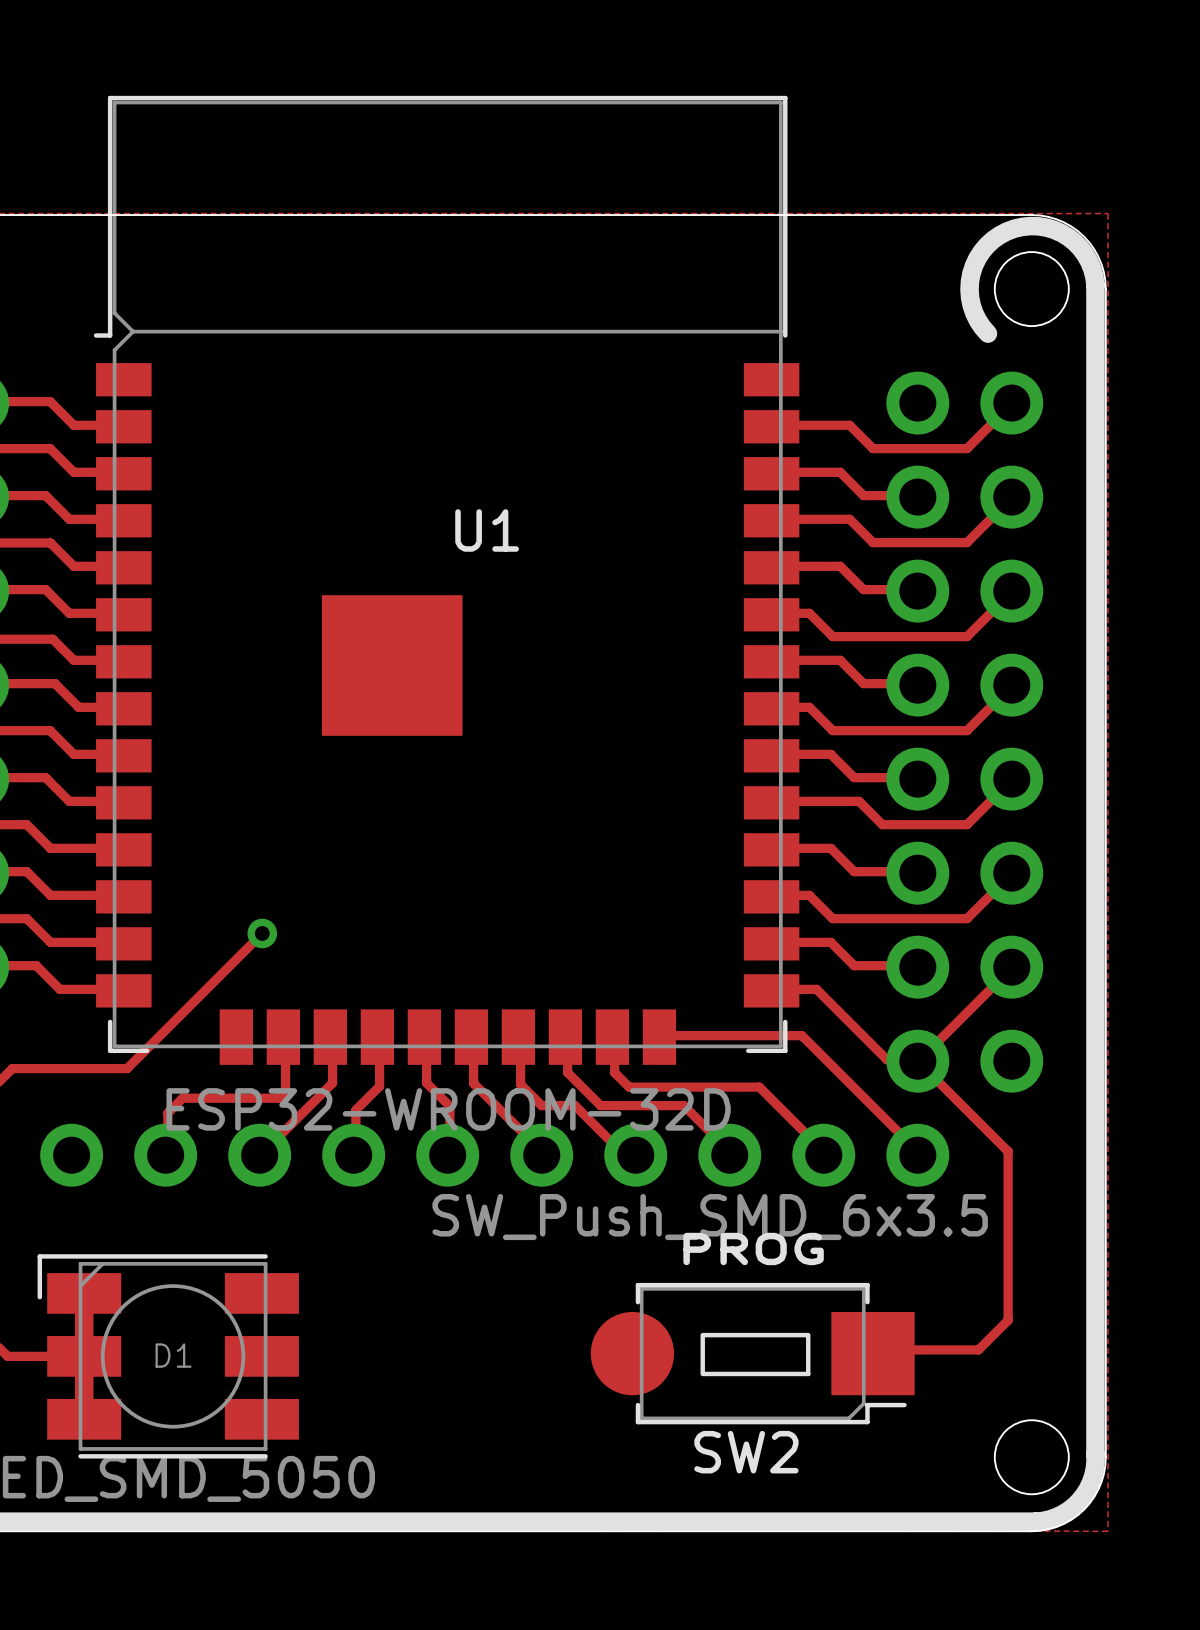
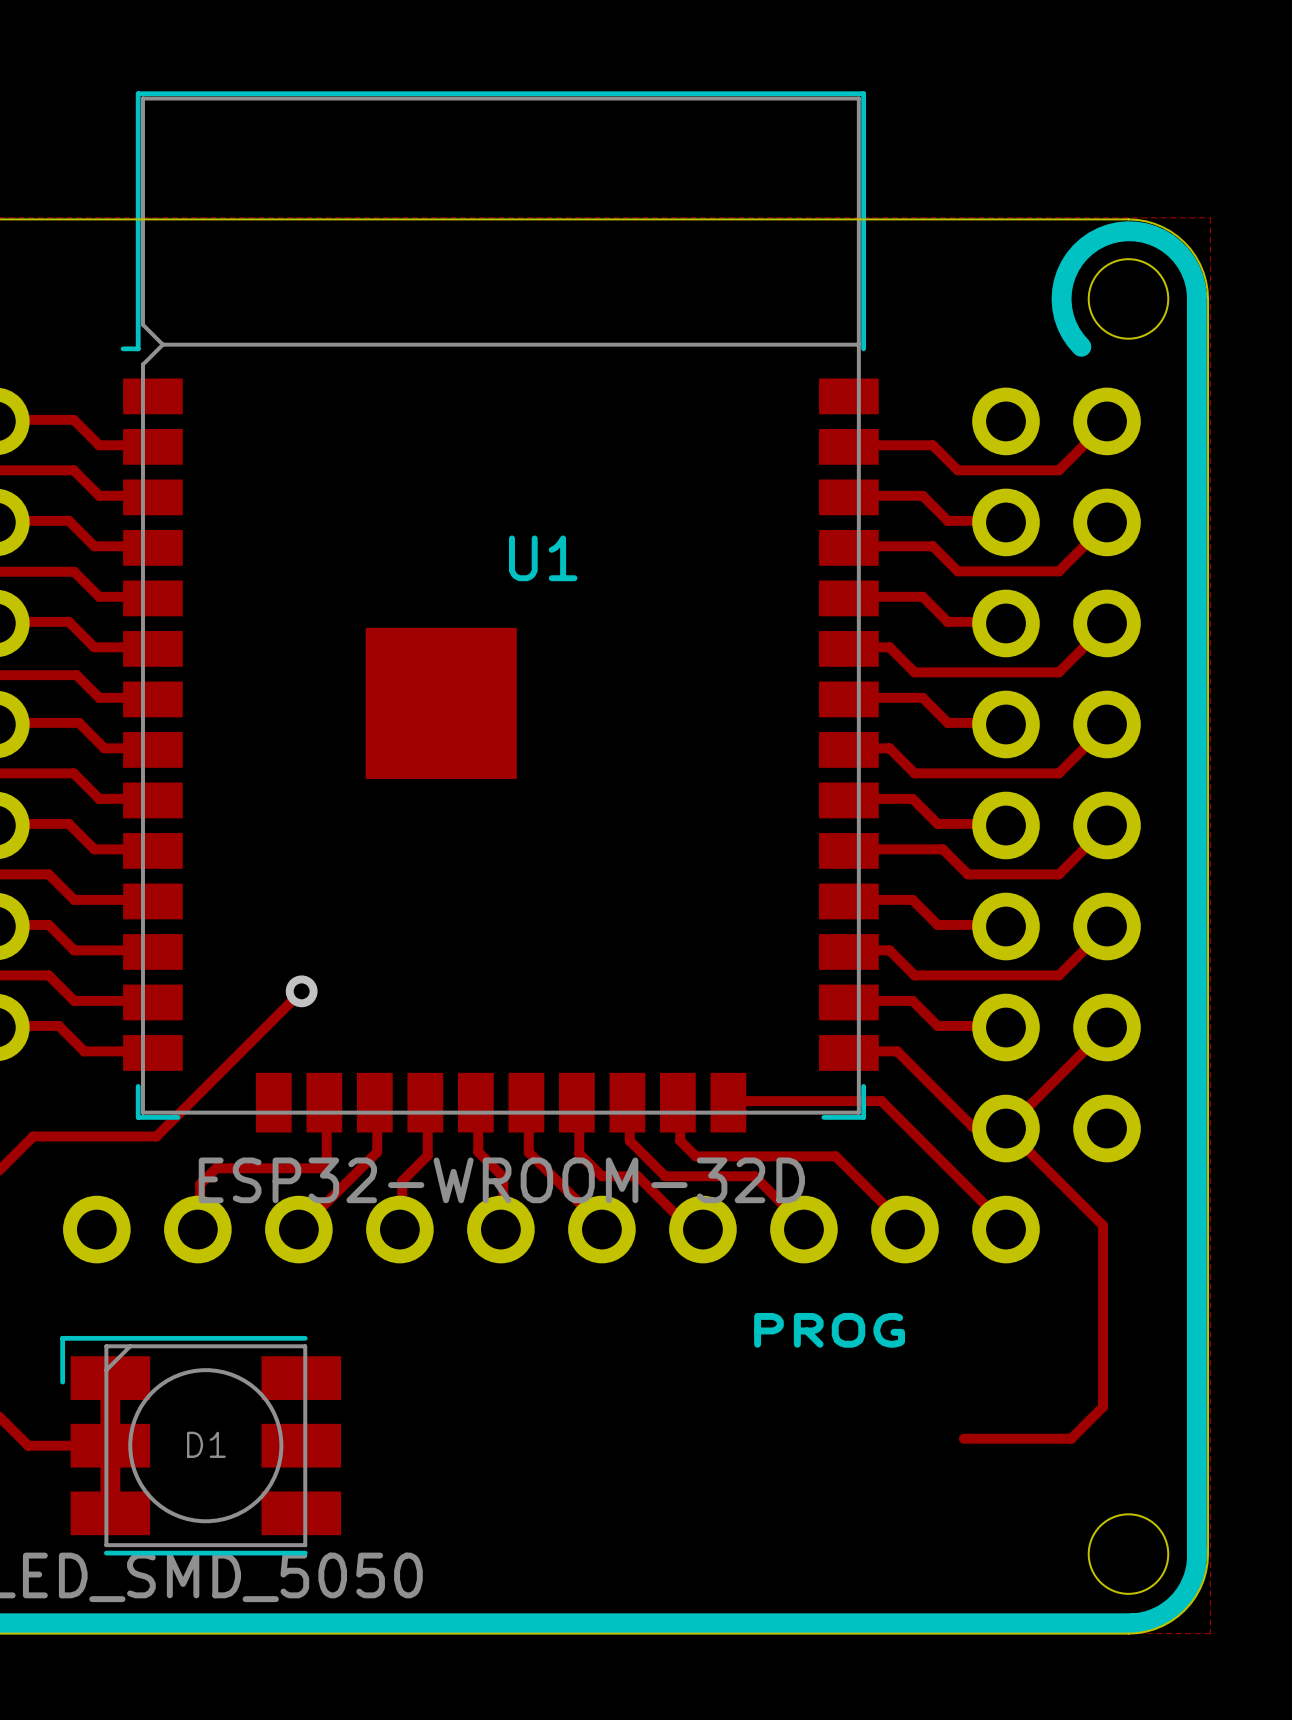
SW2: SW_Push_SMD_6x3.5 (752, 1353) -> none

